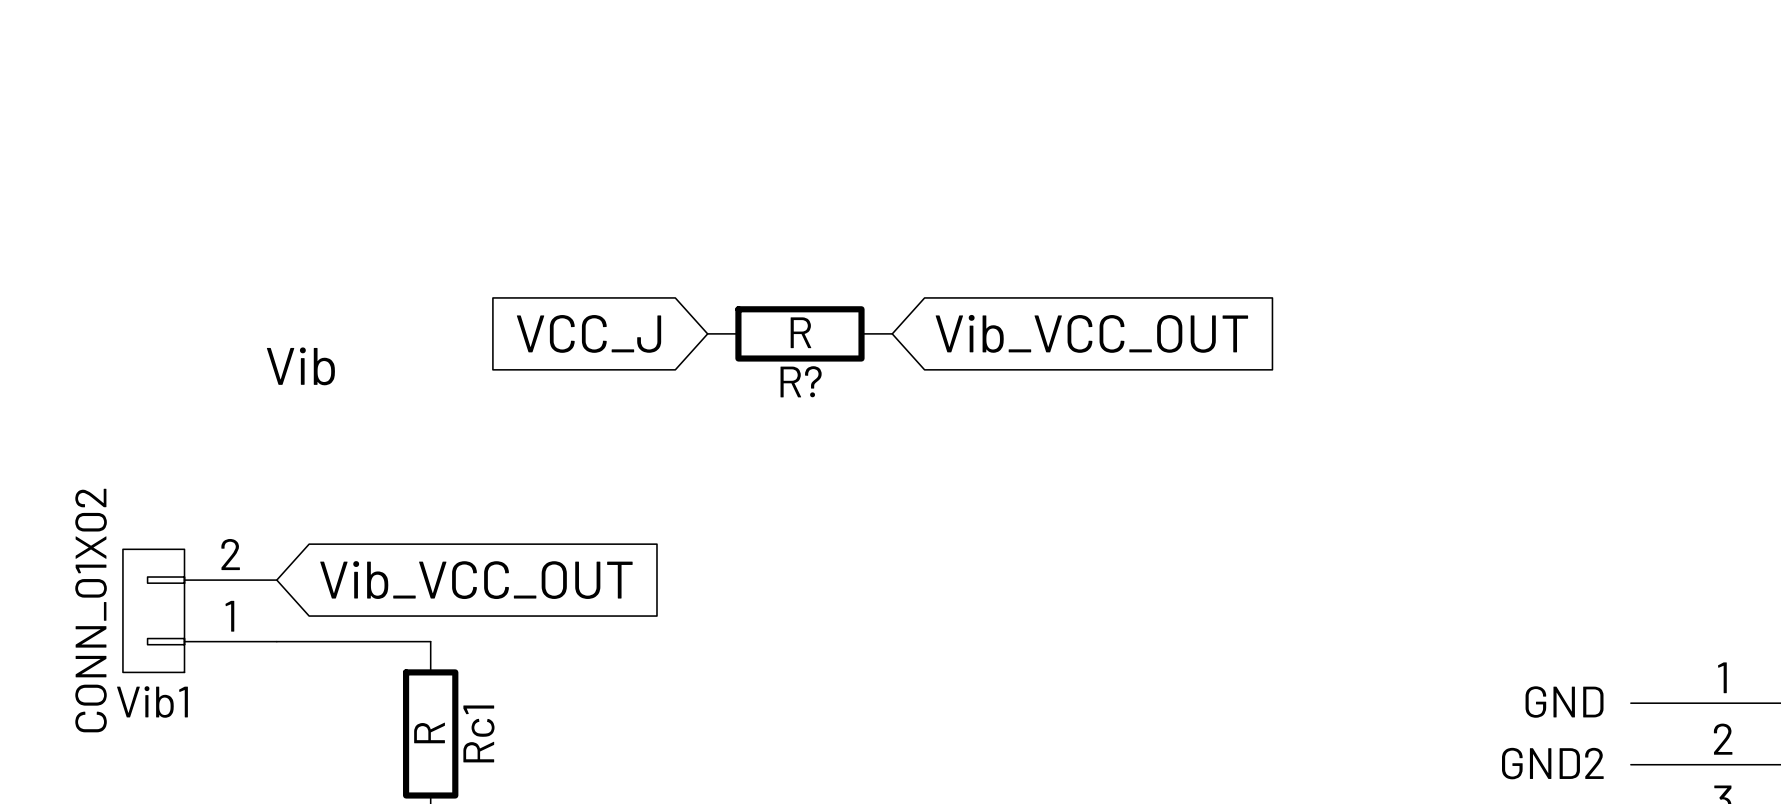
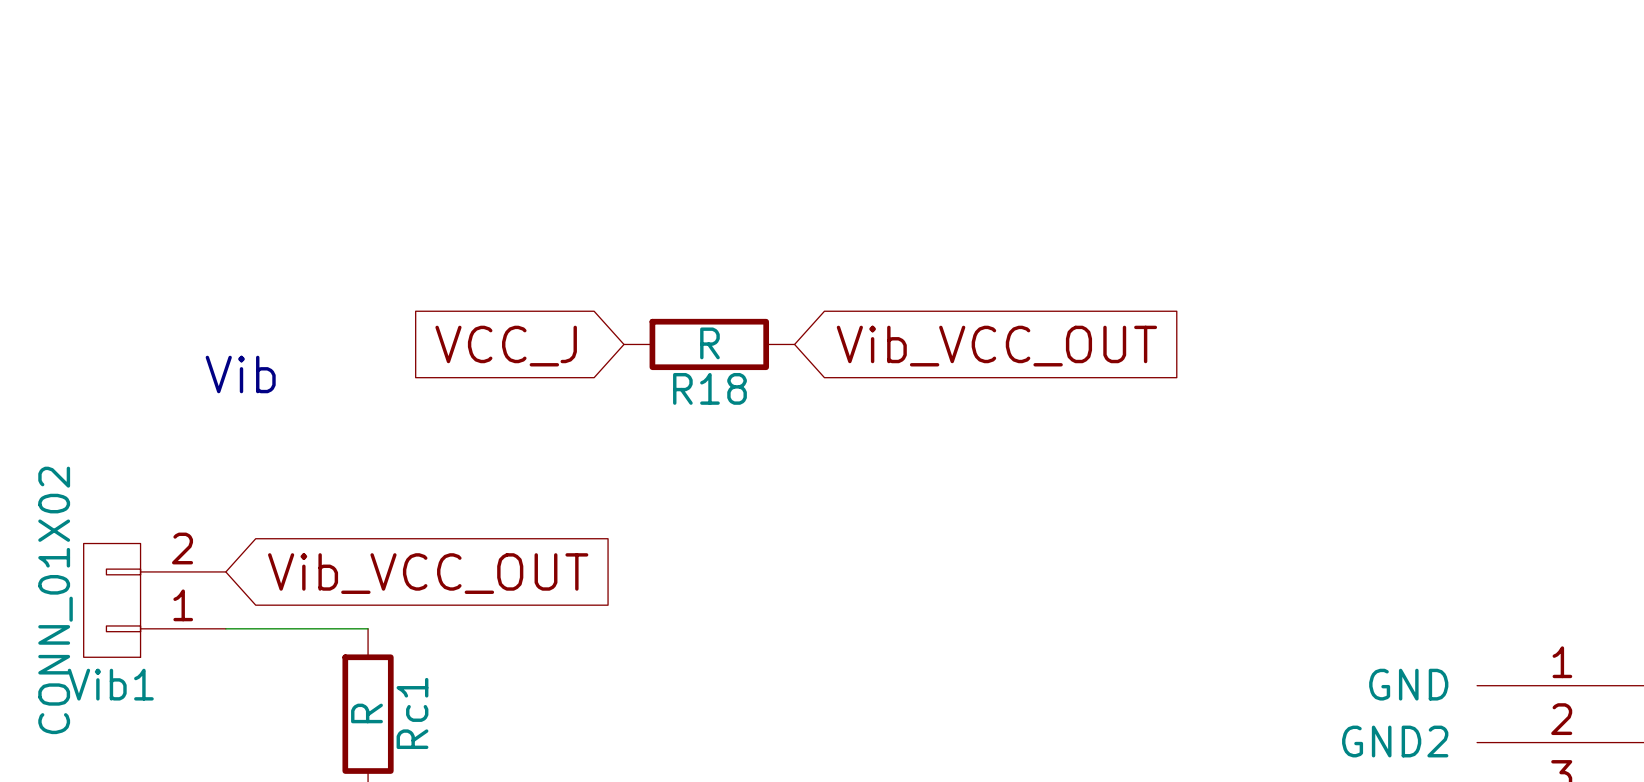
R? name: R? (801, 381) -> R18 (709, 388)

